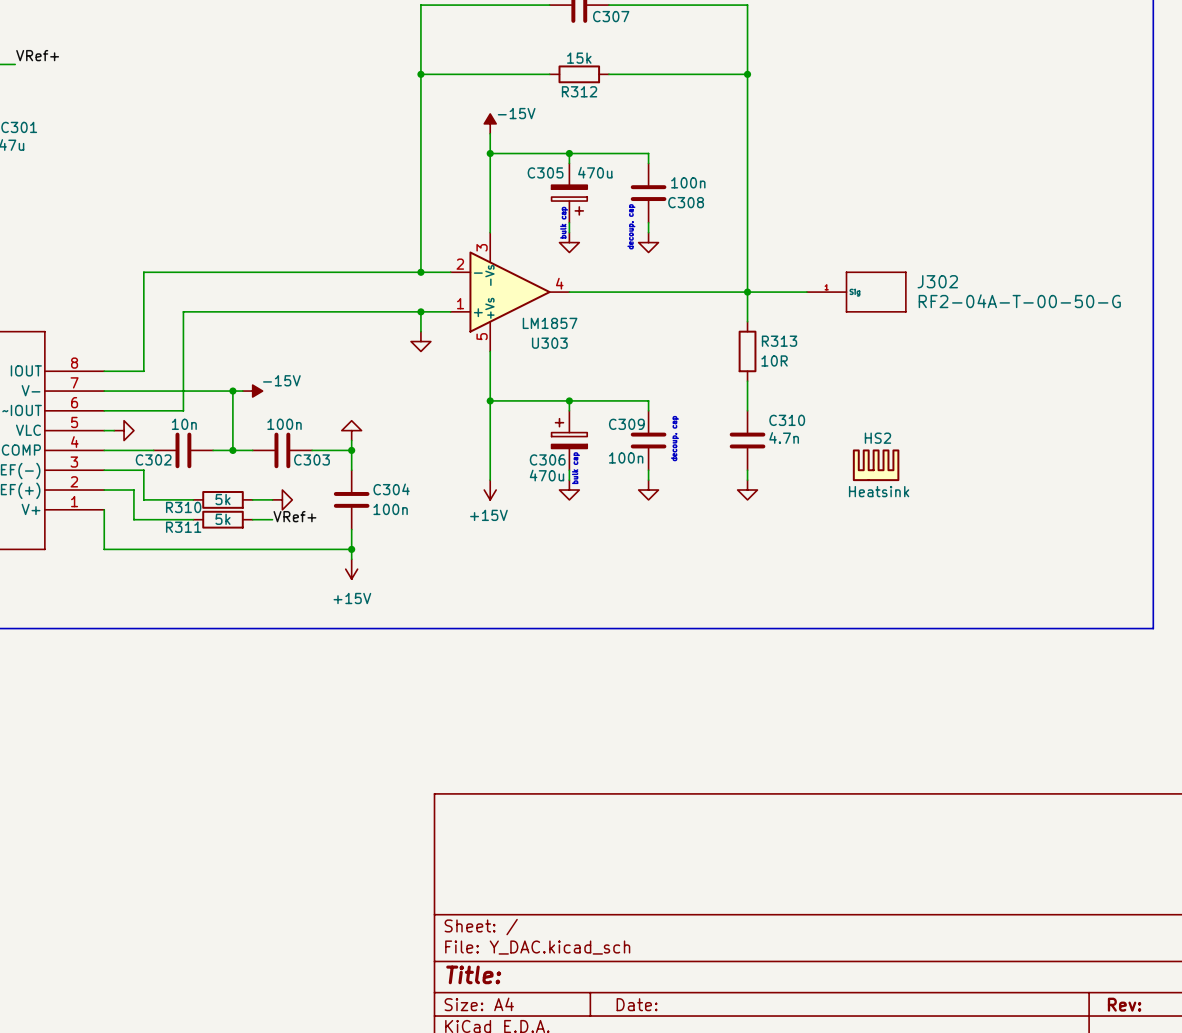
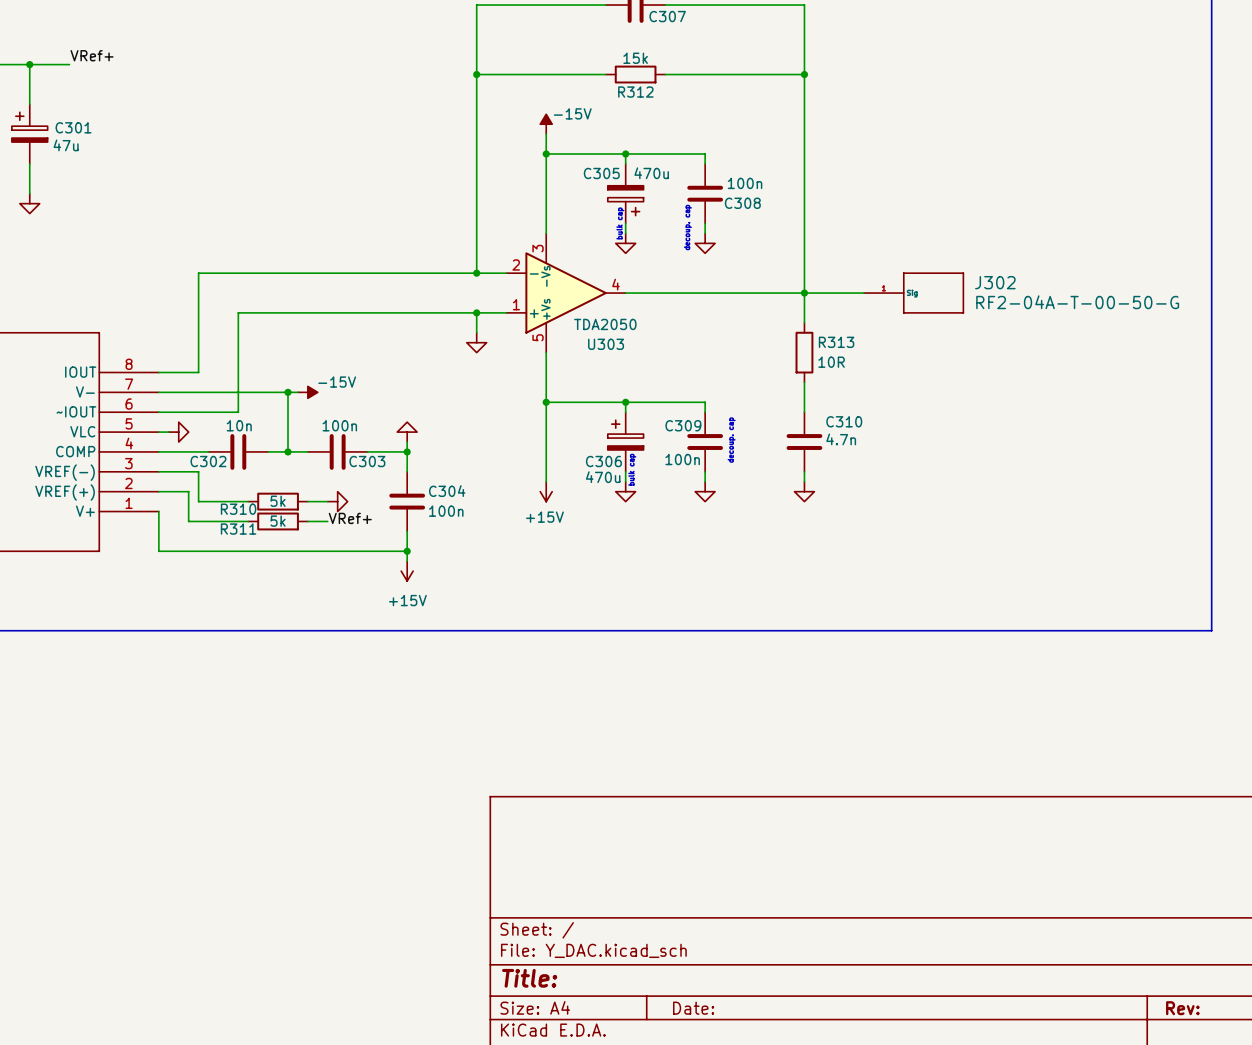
U303 value: LM1857 (550, 323) -> TDA2050 (605, 324)
HS2: Heatsink (876, 465) -> none

